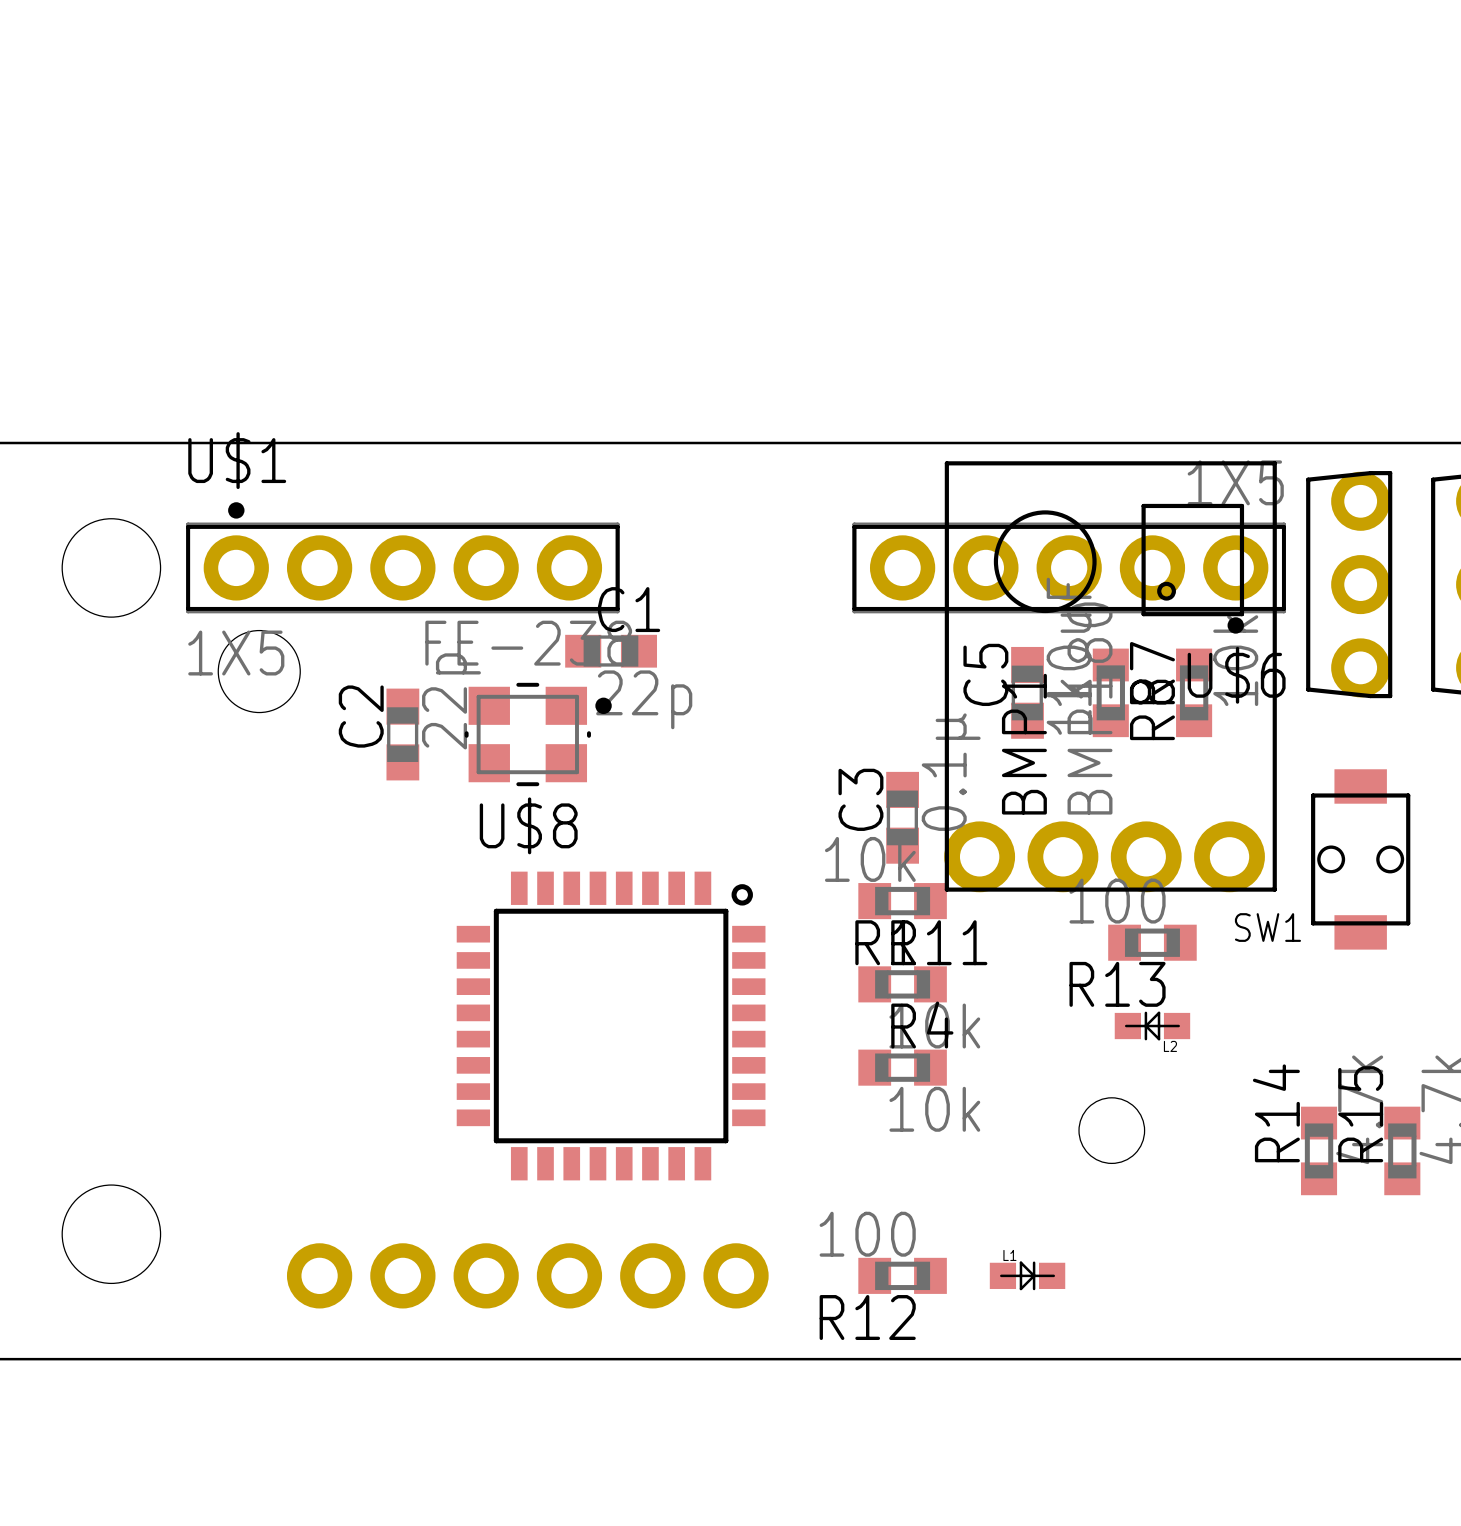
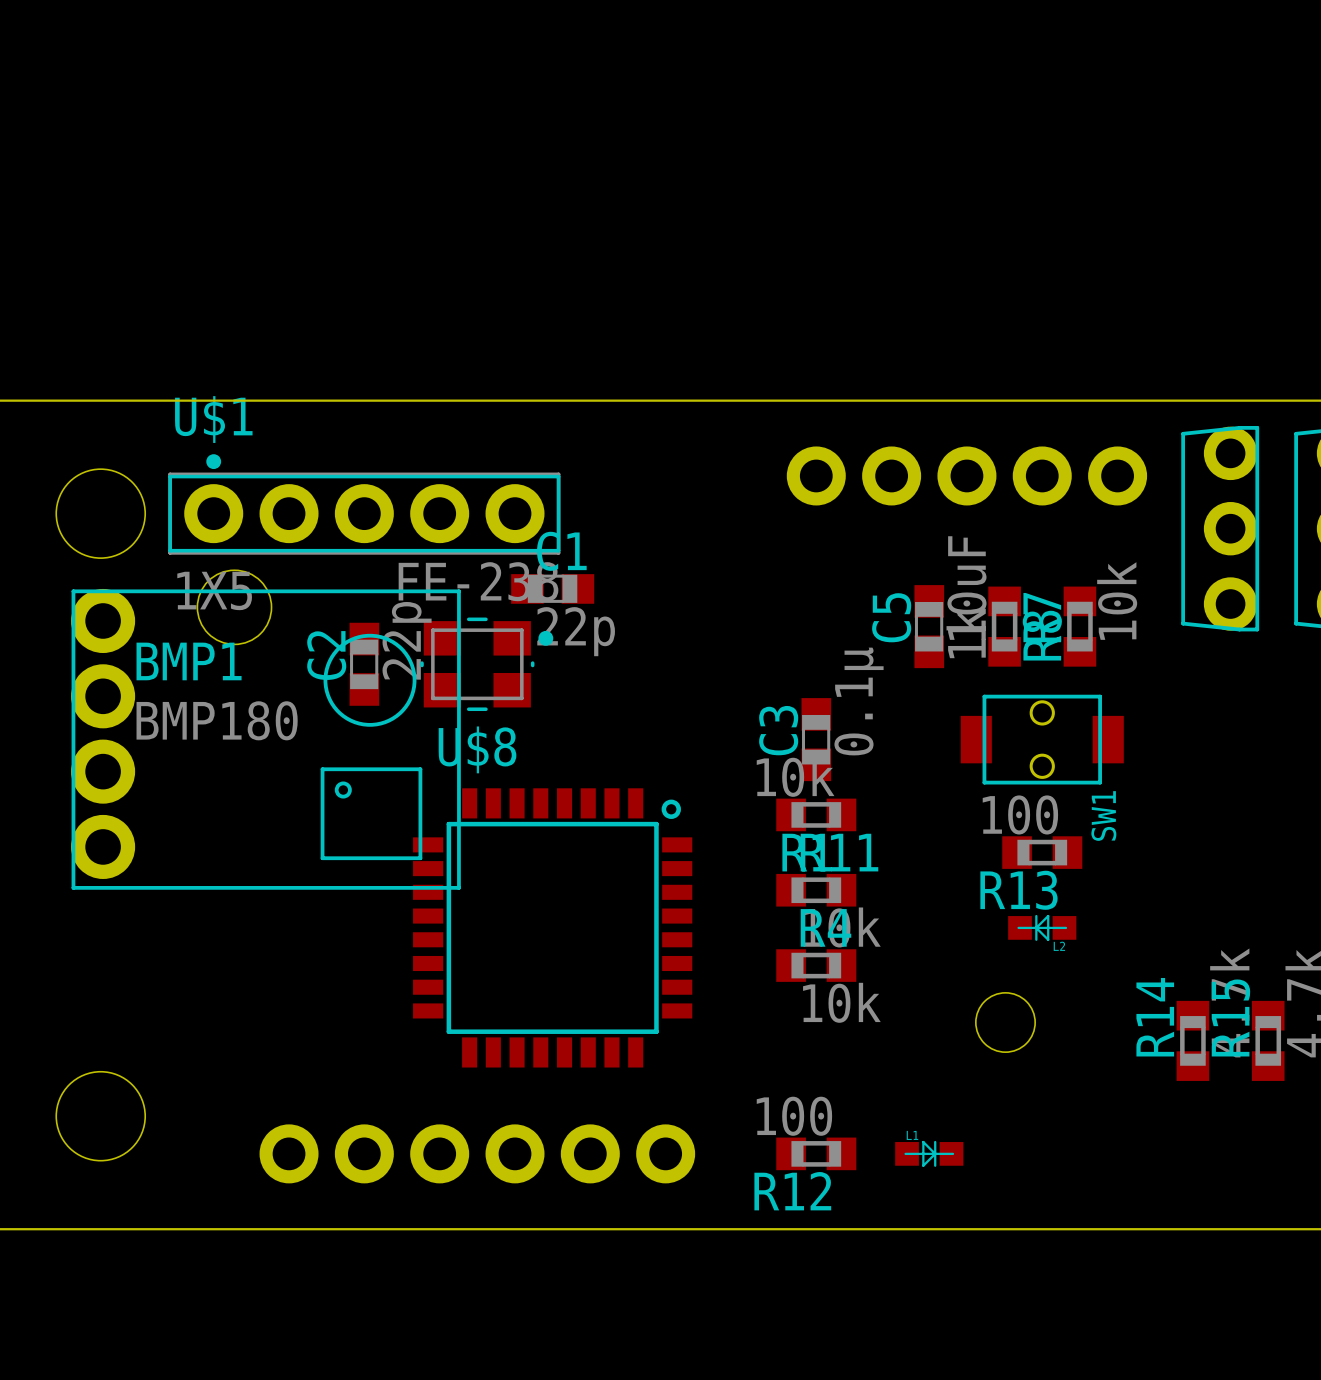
U$6 side: top (1069, 578) -> bottom (966, 475)
BMP1 rotation: 0° (1110, 676) -> 90° clockwise (265, 739)
BMP1 position: (1110, 676) -> (265, 739)
SW1 rotation: 0° (1360, 859) -> 90° clockwise (1042, 739)
SW1 position: (1360, 859) -> (1042, 739)
SW1 name position: SW1 (1267, 927) -> SW1 (1103, 816)

